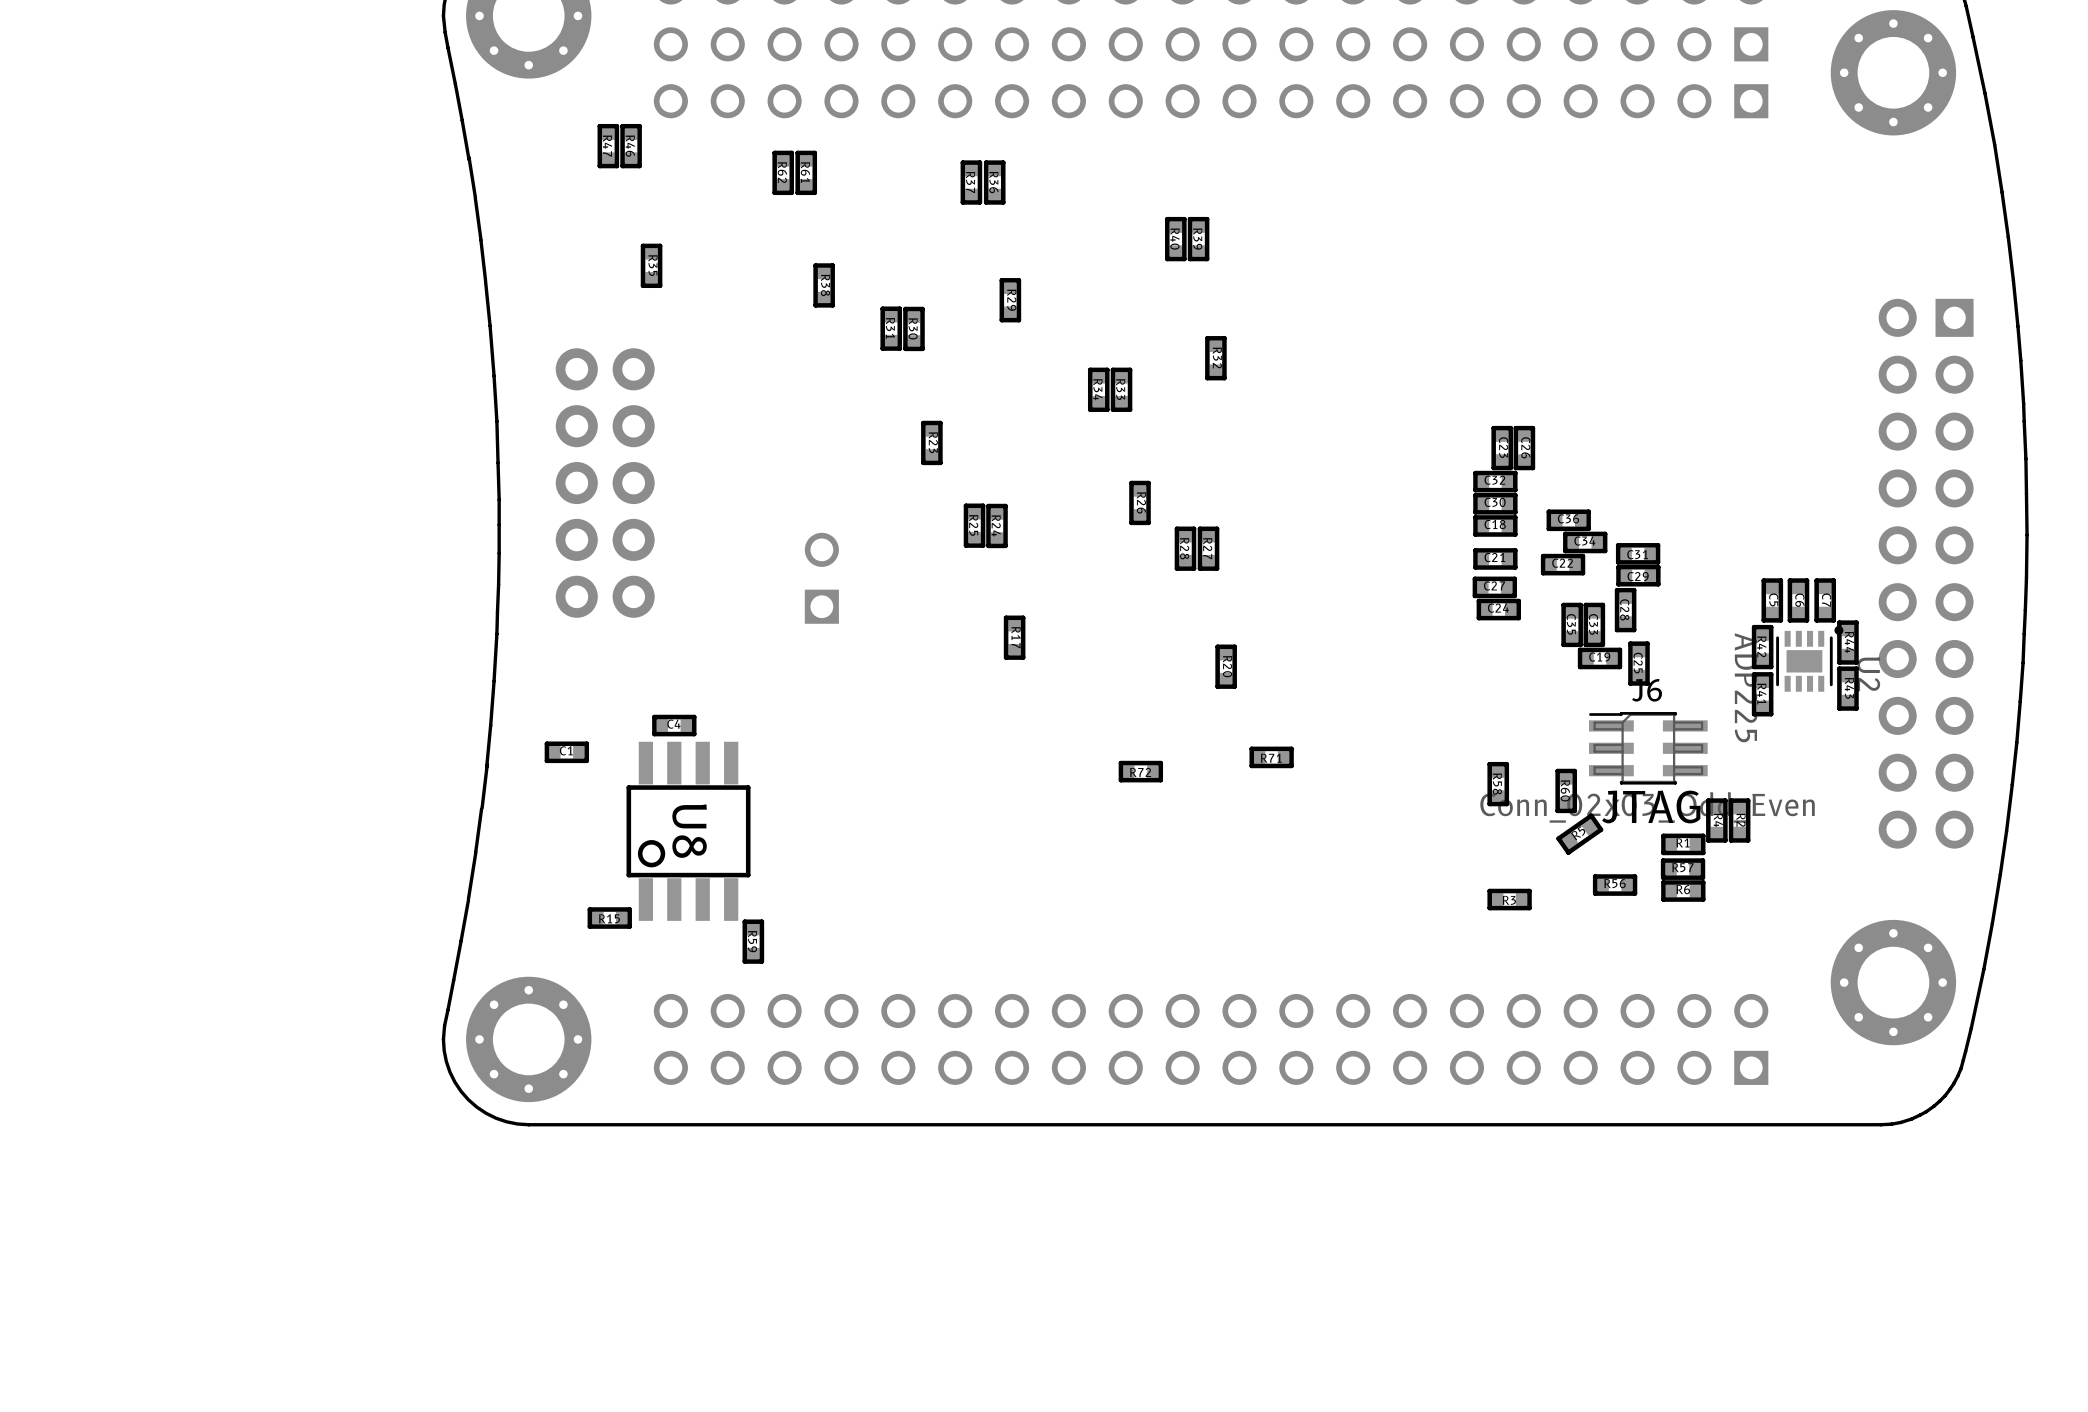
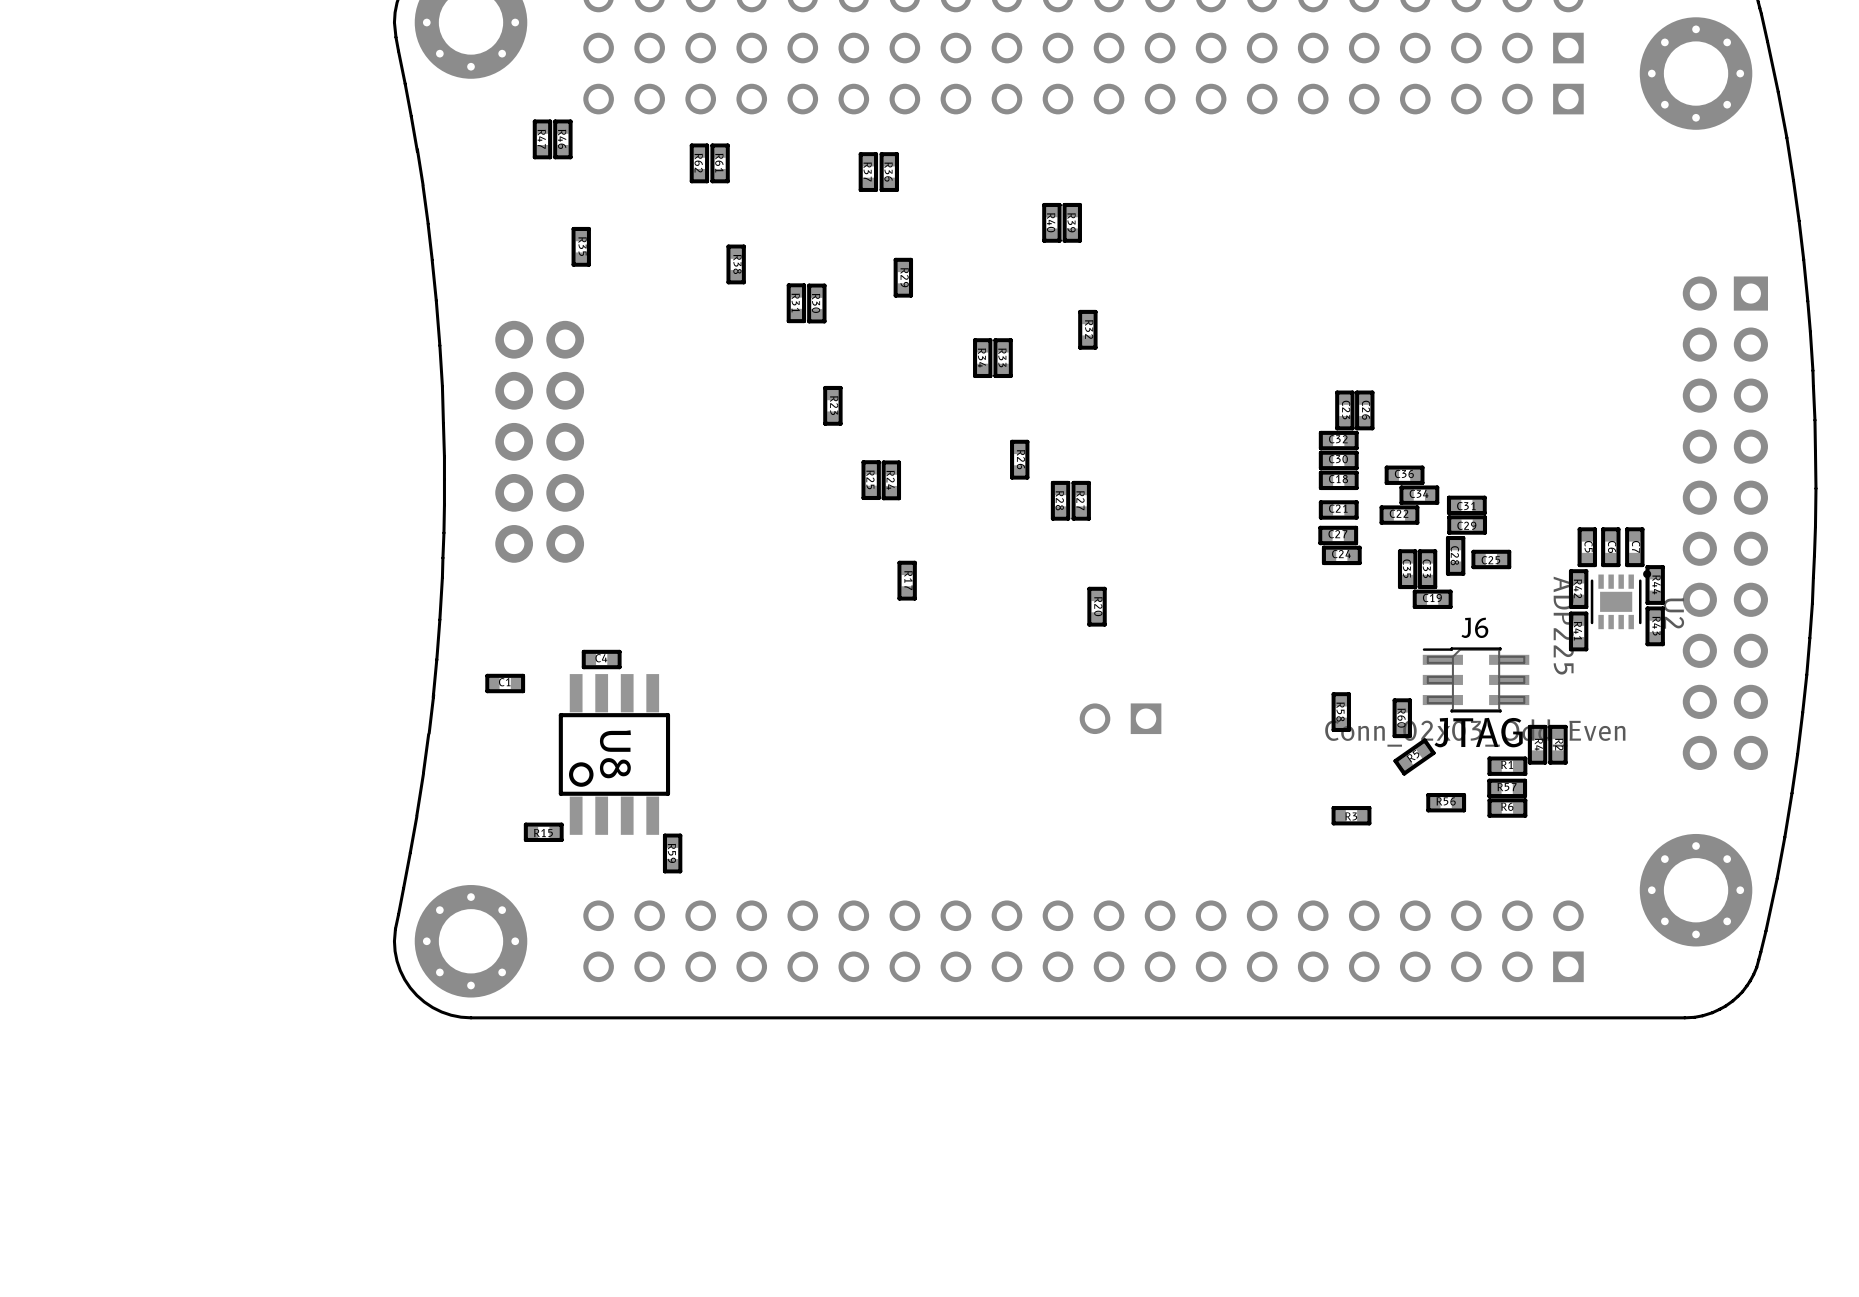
part rotation: 0° (821, 578) -> 90° counterclockwise (1120, 718)
part position: (821, 578) -> (1120, 718)
C25 rotation: 0° (1638, 663) -> 90° clockwise (1491, 559)
C25 position: (1638, 663) -> (1491, 559)
R71: (1271, 757) -> none
R72: (1140, 771) -> none

